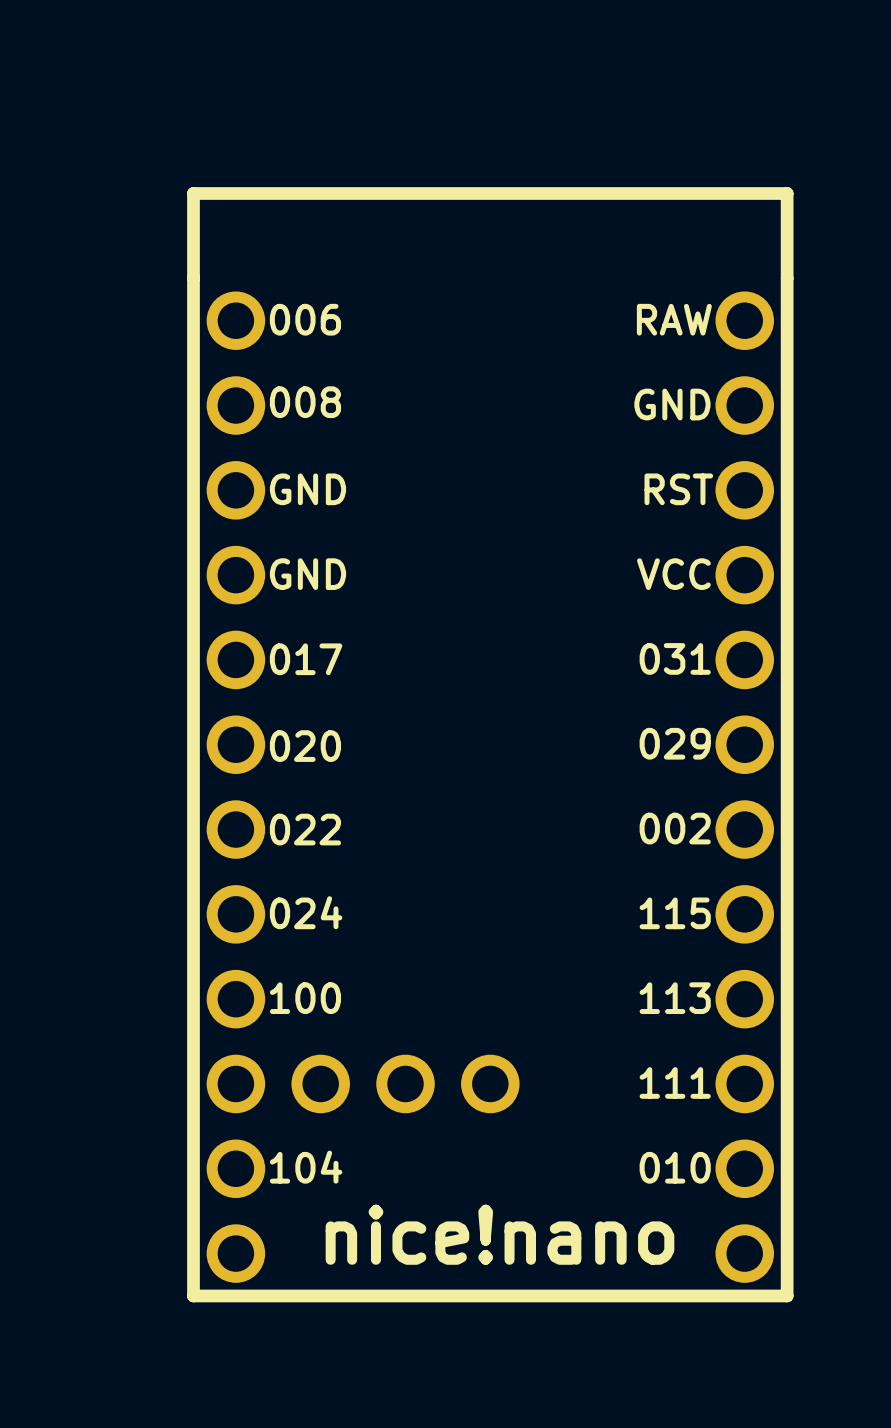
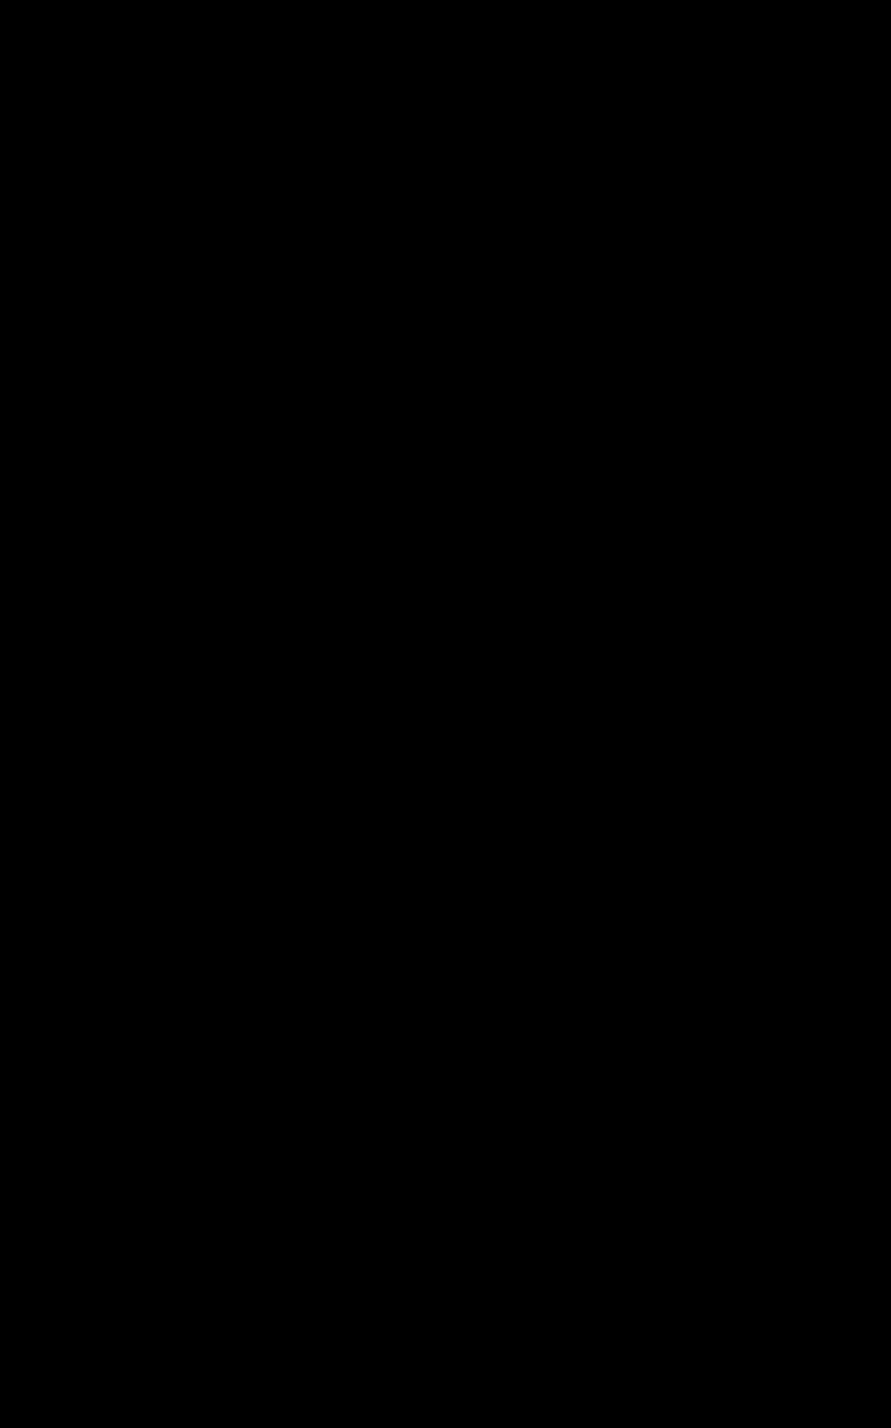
part: (490, 744) -> none

